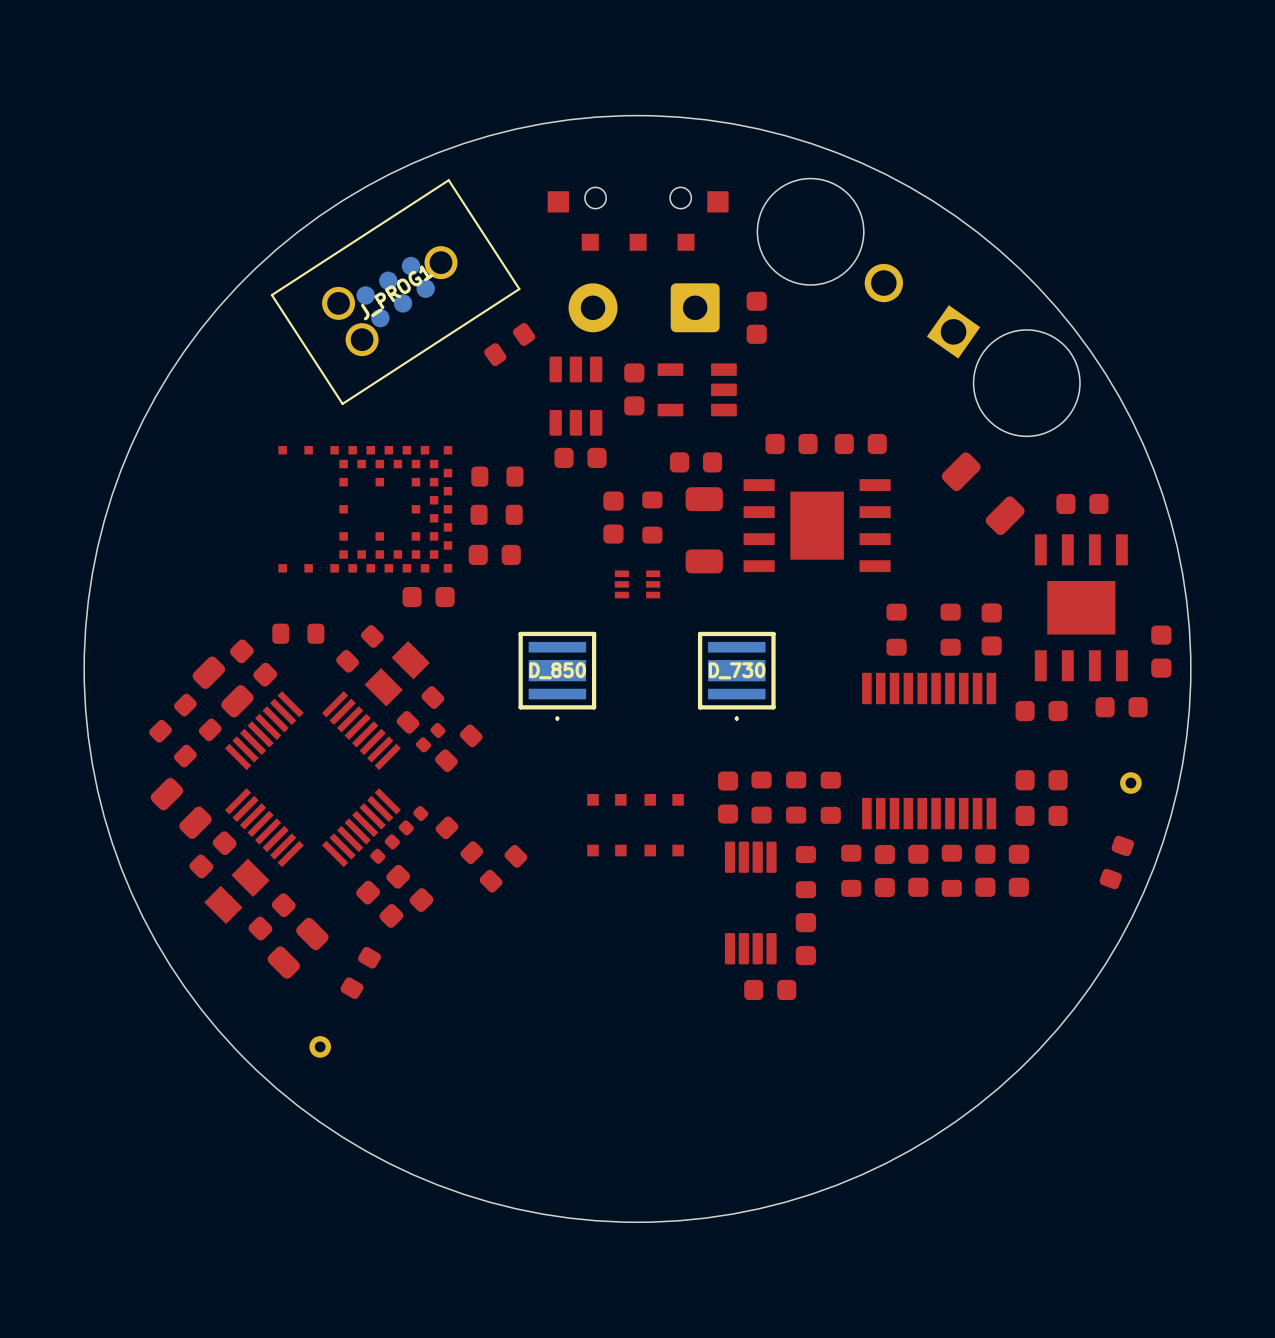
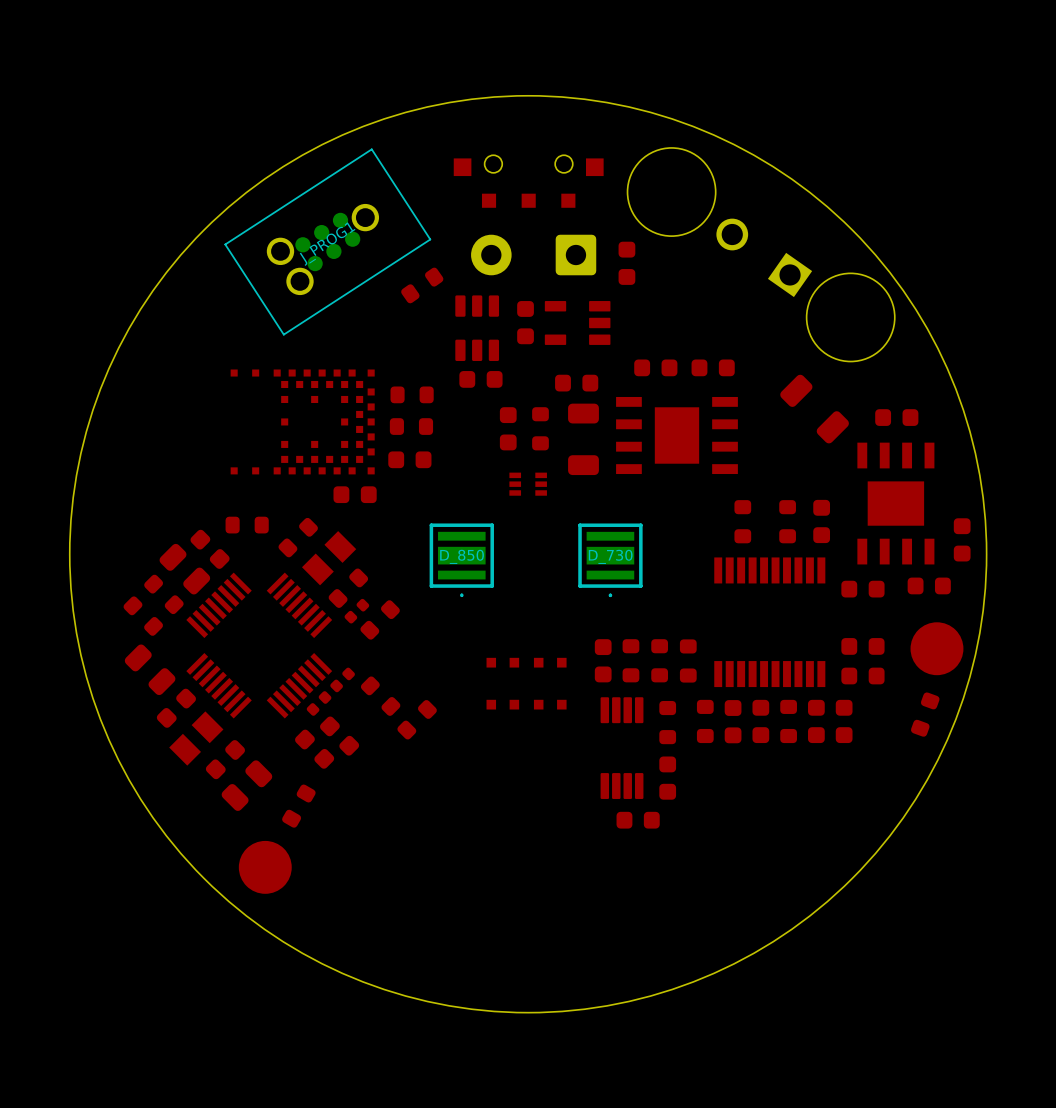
part footprint: [1120, 772, 1142, 794] -> [910, 622, 964, 676]
part footprint: [309, 1036, 332, 1058] -> [238, 840, 292, 894]

